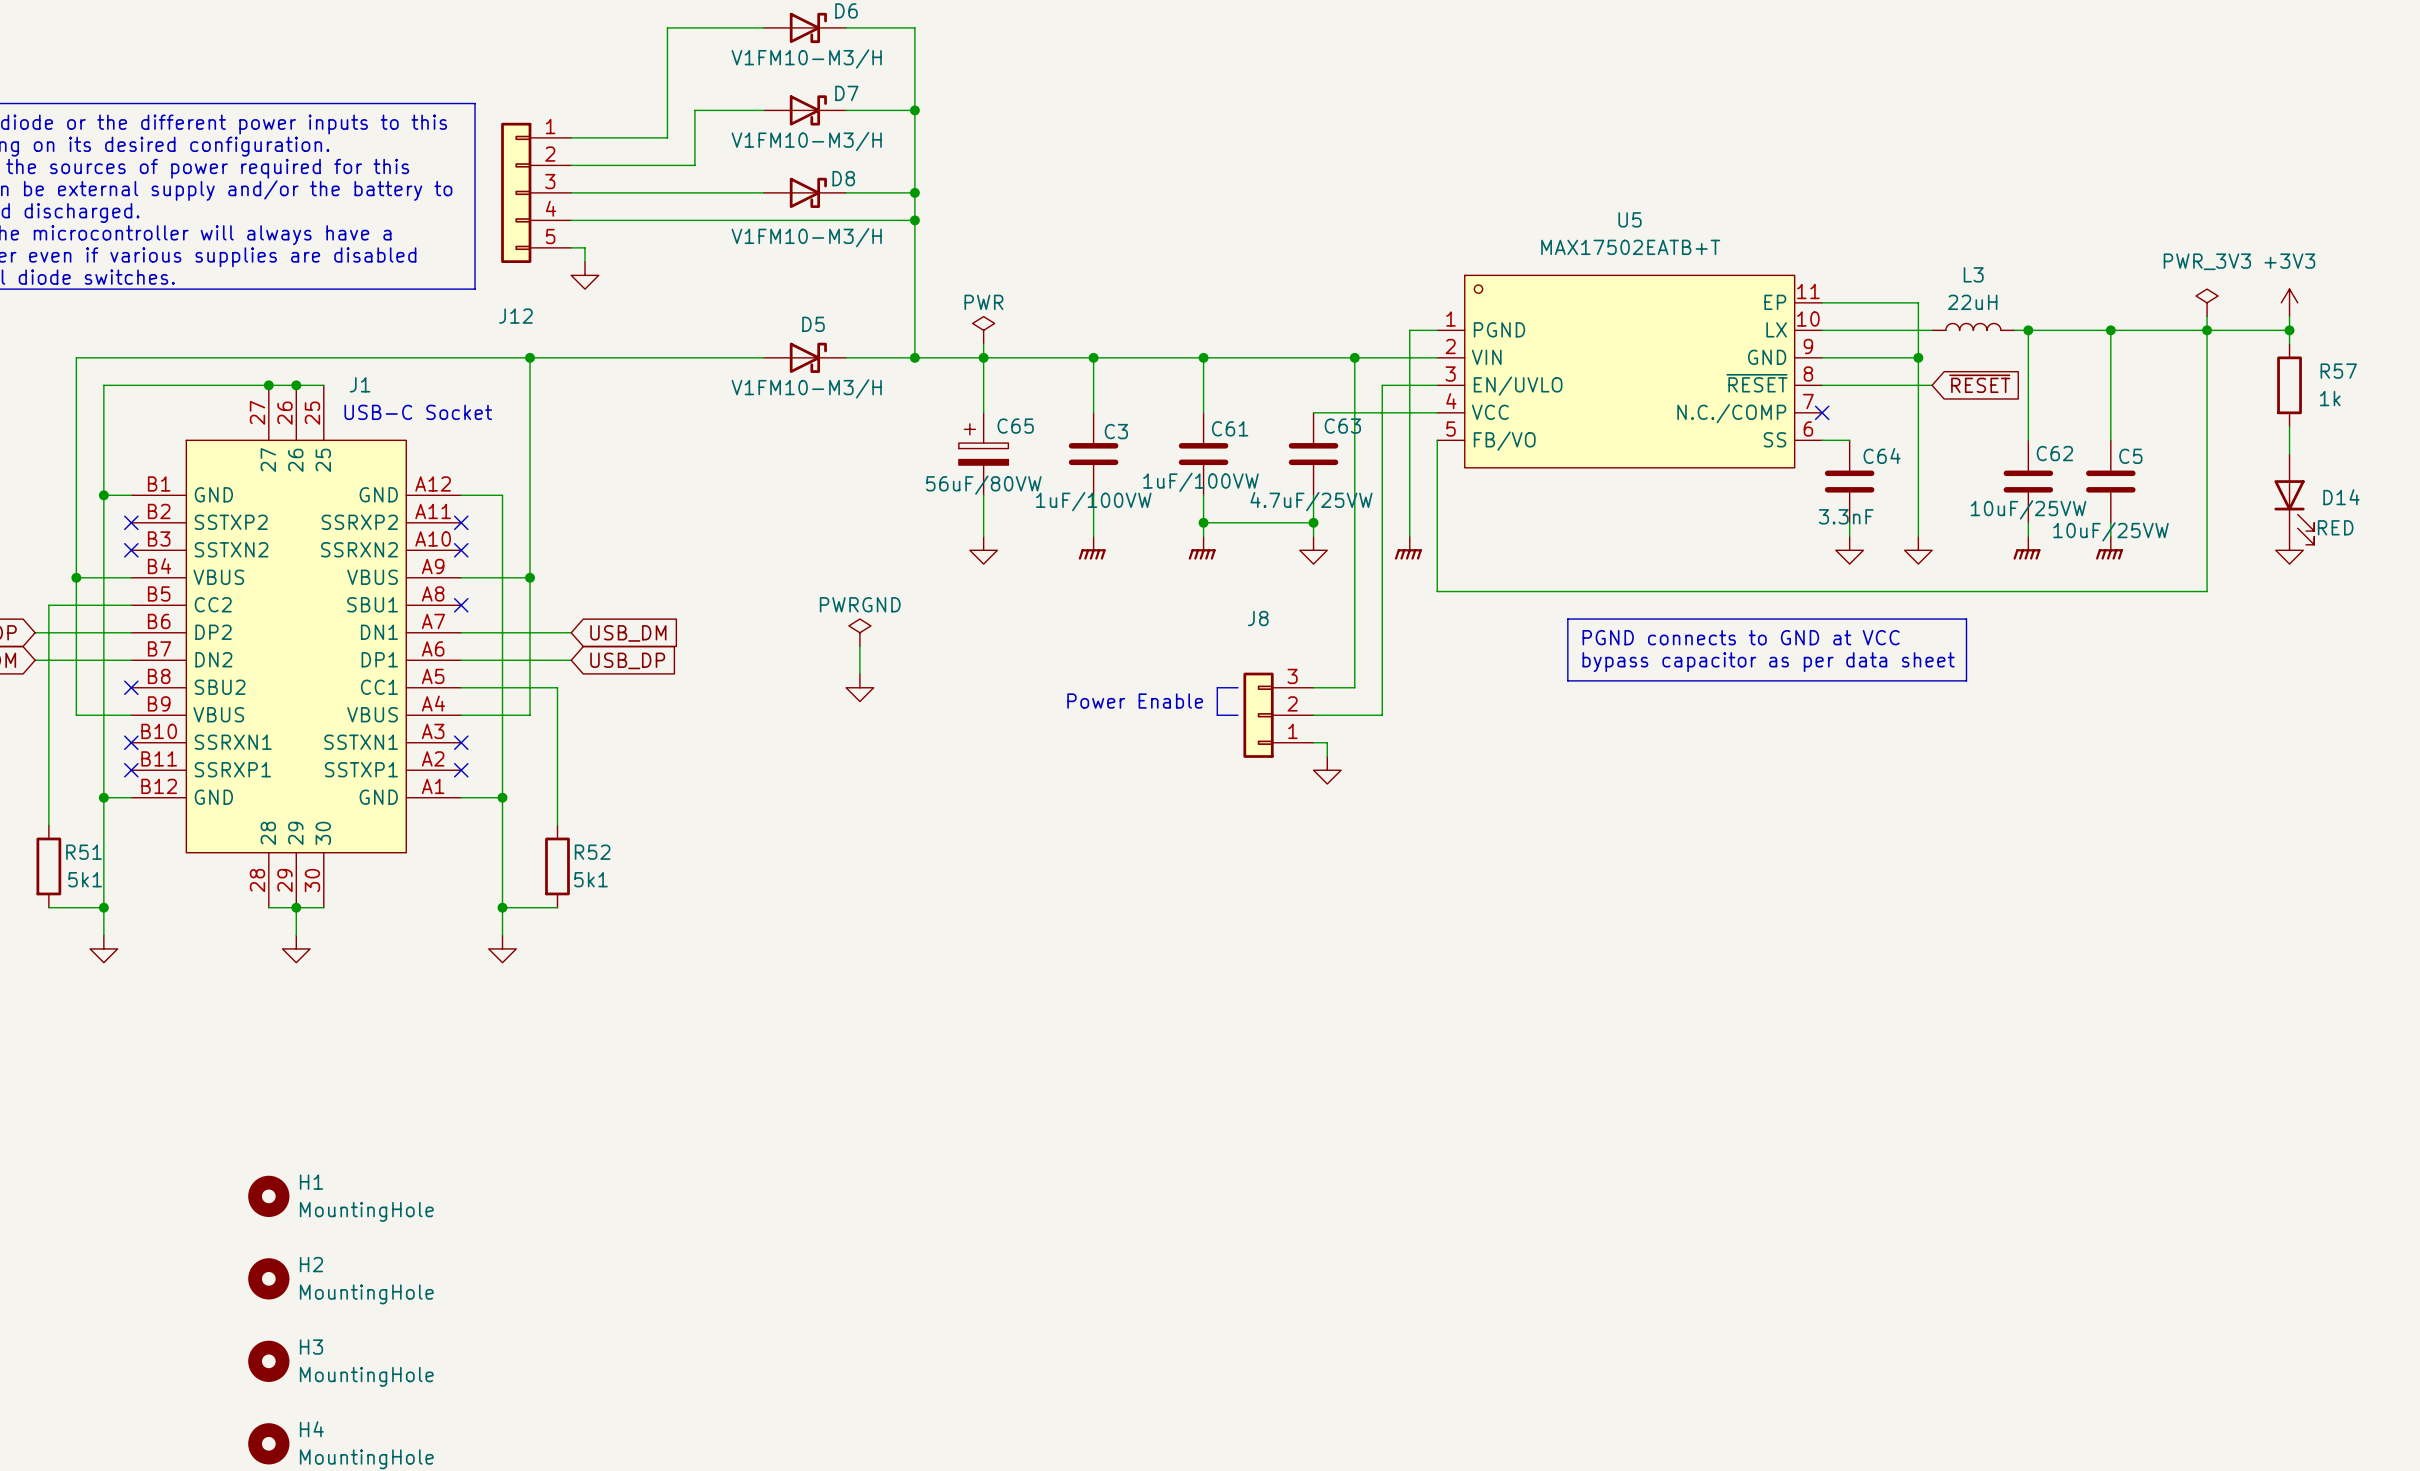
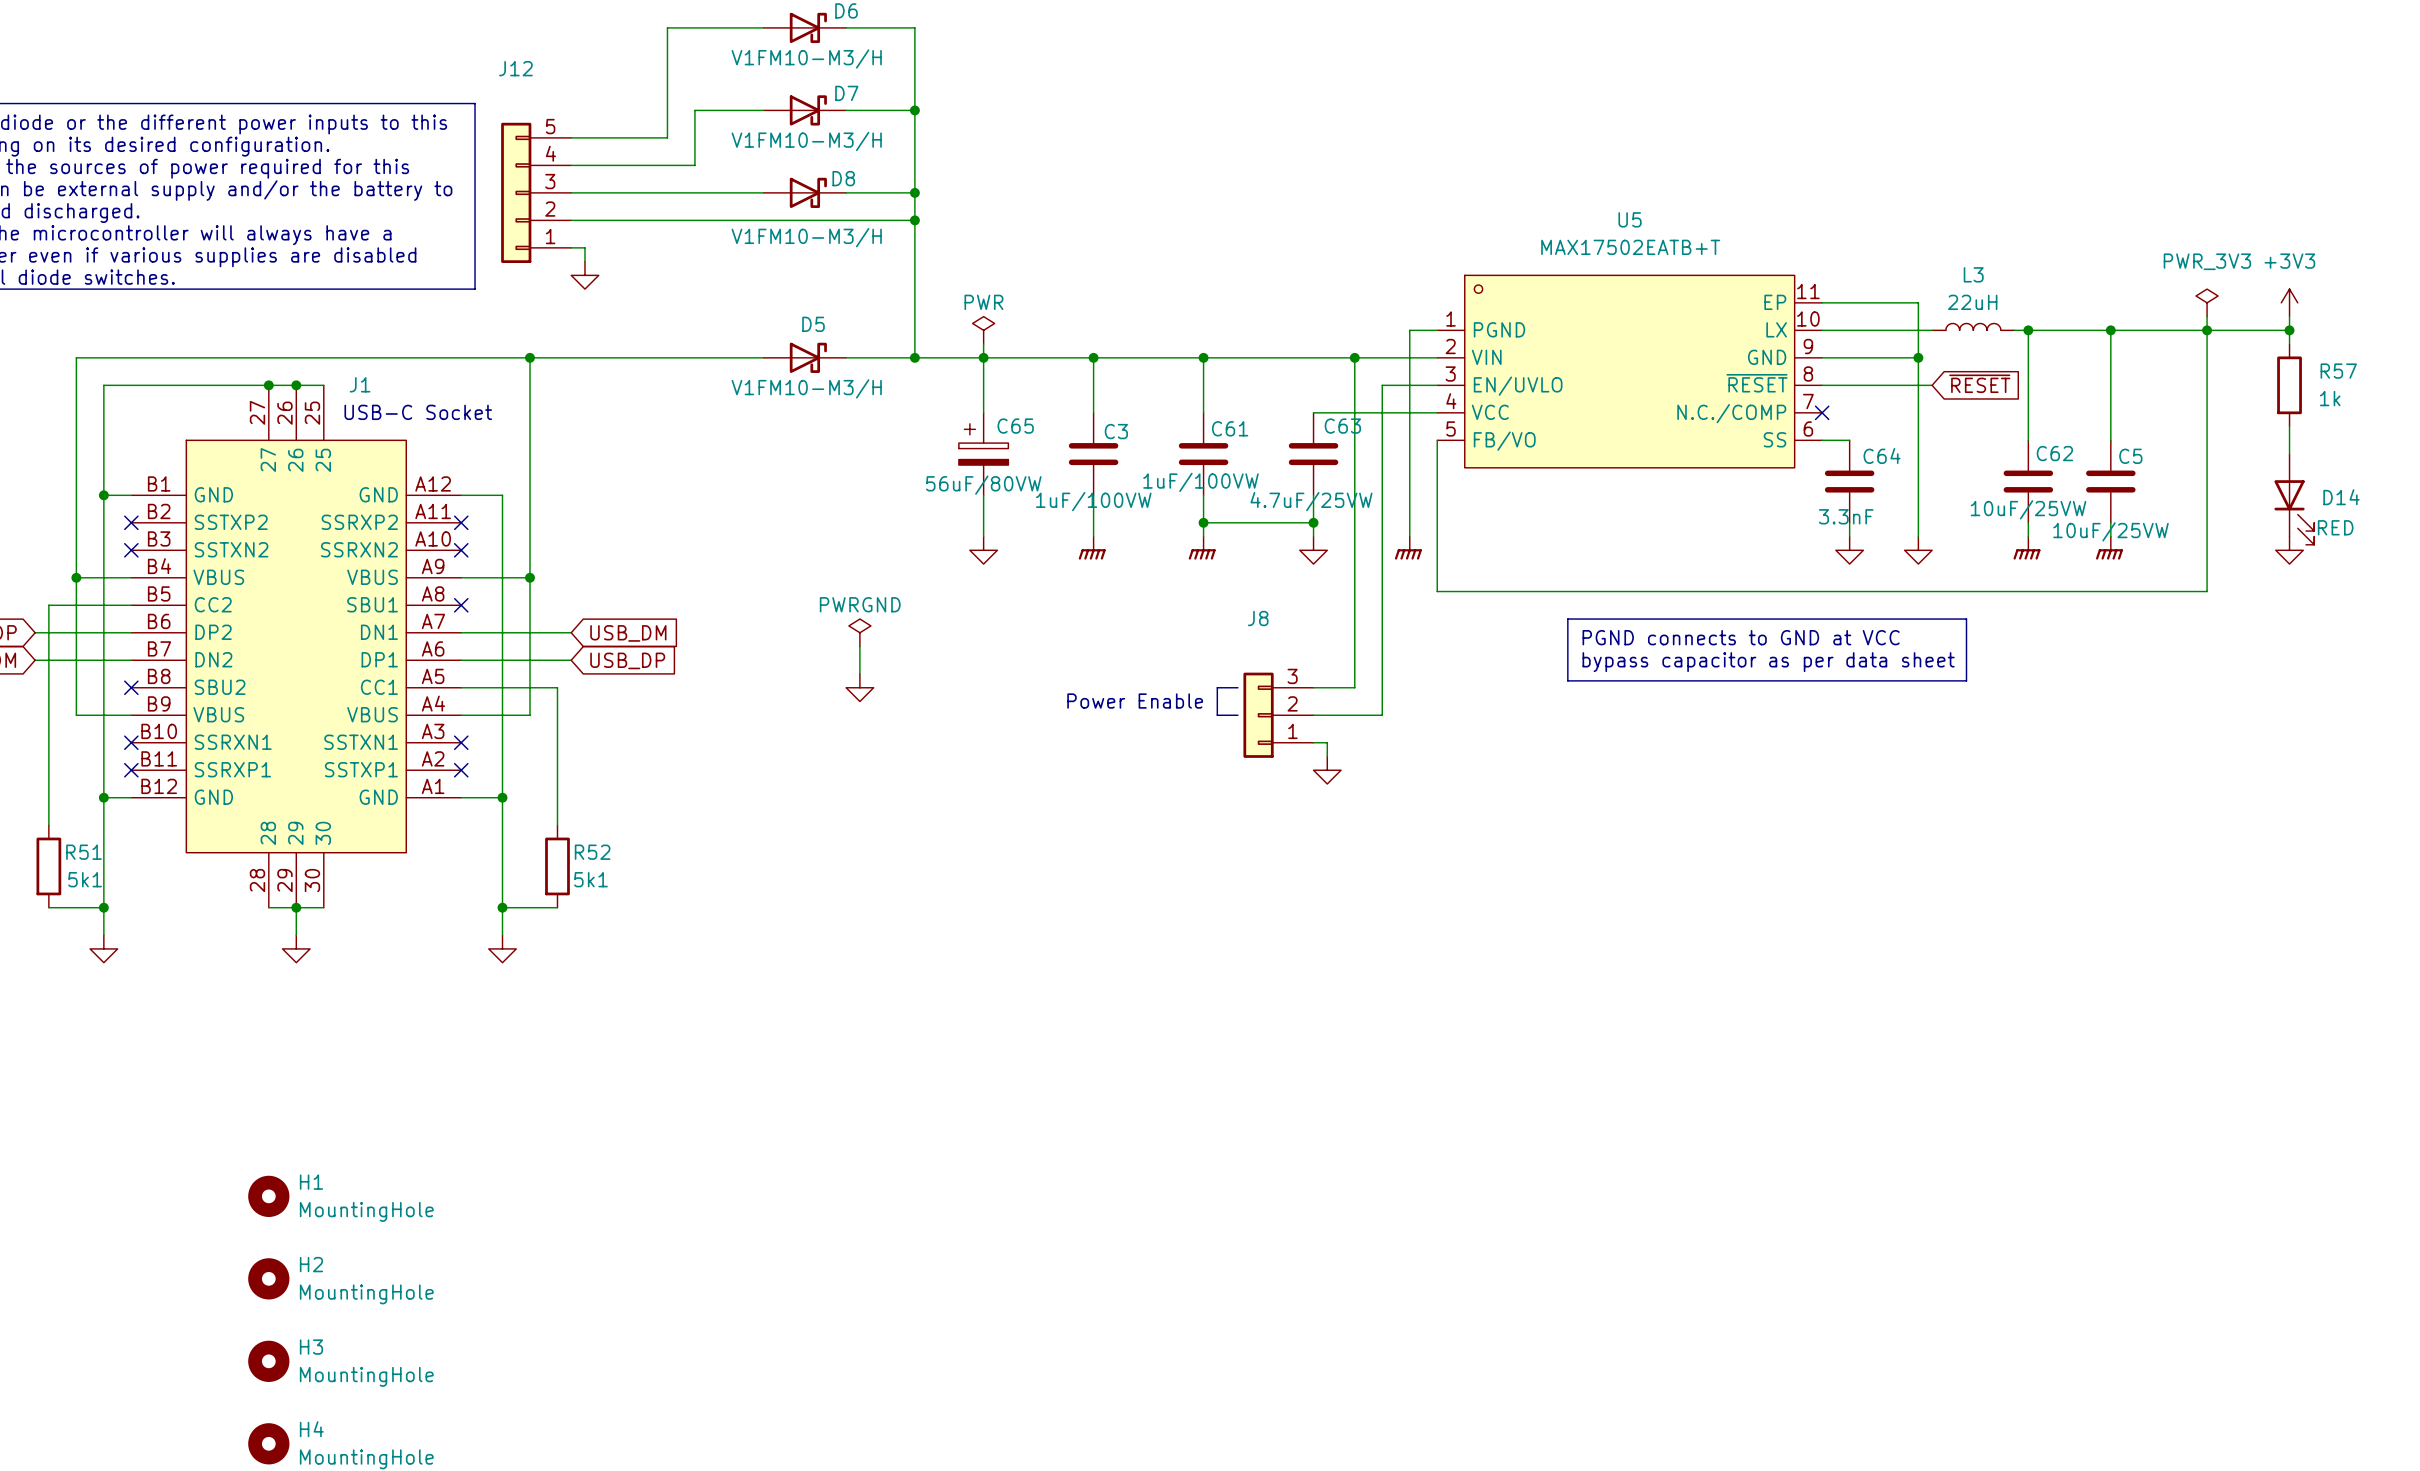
J12 flip: as is (516, 192) -> up-down (516, 192)

